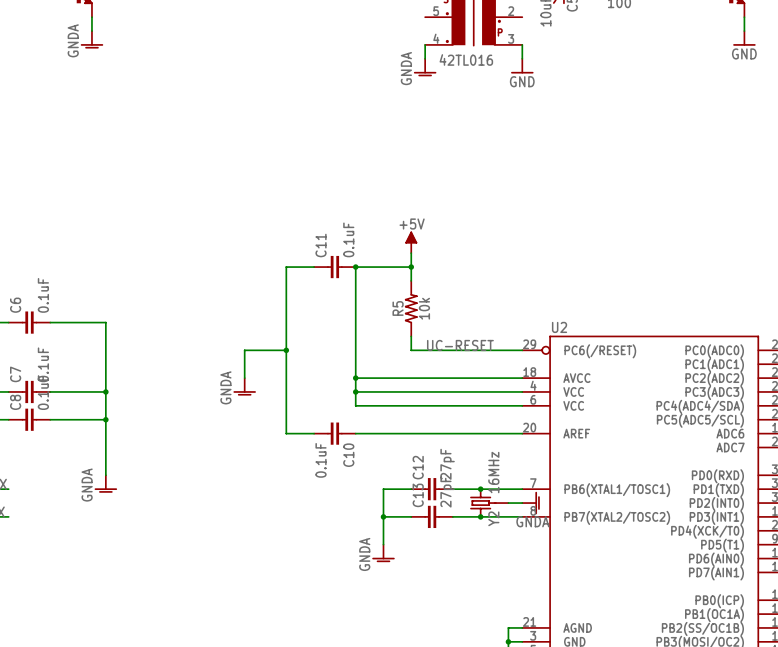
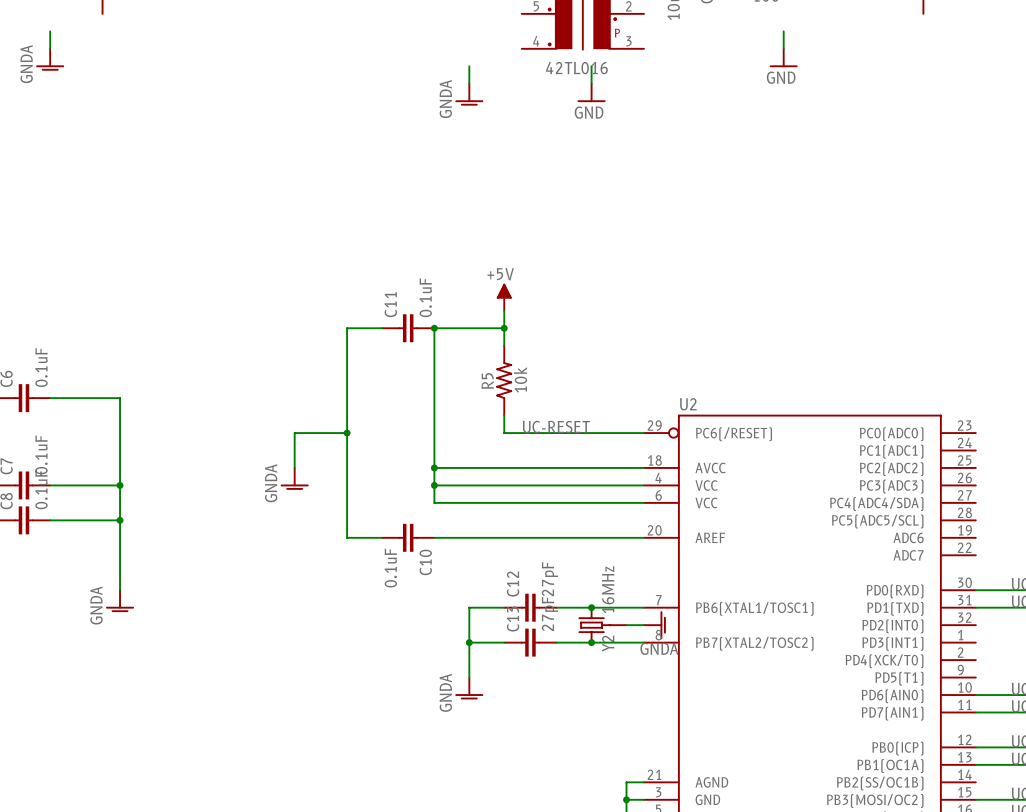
wire: (91, 17) (91, 31) -> (50, 31) (50, 48)
wire: (744, 17) (744, 31) -> (783, 31) (783, 48)
power symbol: GND (744, 38) -> none
power symbol position: GNDA (91, 39) -> GNDA (50, 59)
wire: (425, 44) (425, 58) -> (469, 66) (469, 83)
wire: (522, 44) (522, 58) -> (591, 66) (591, 83)
power symbol: none -> GND (783, 57)
power symbol position: GND (522, 66) -> GND (591, 92)
power symbol position: GNDA (425, 67) -> GNDA (469, 94)

